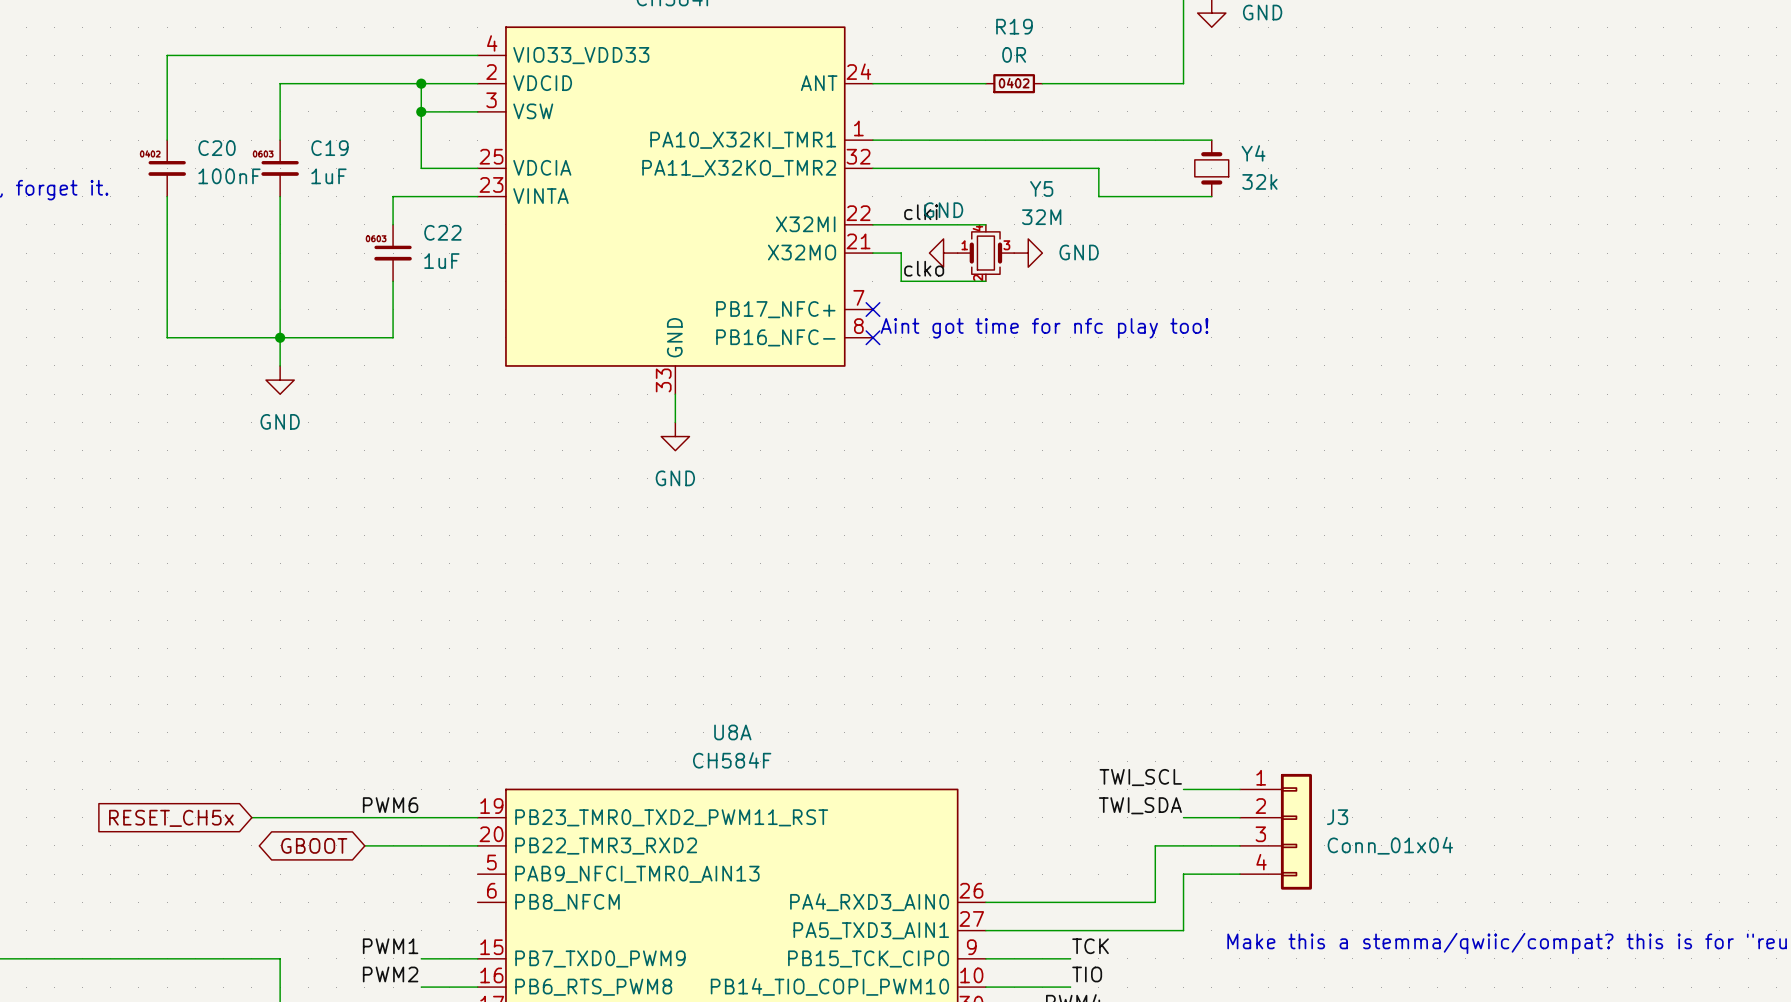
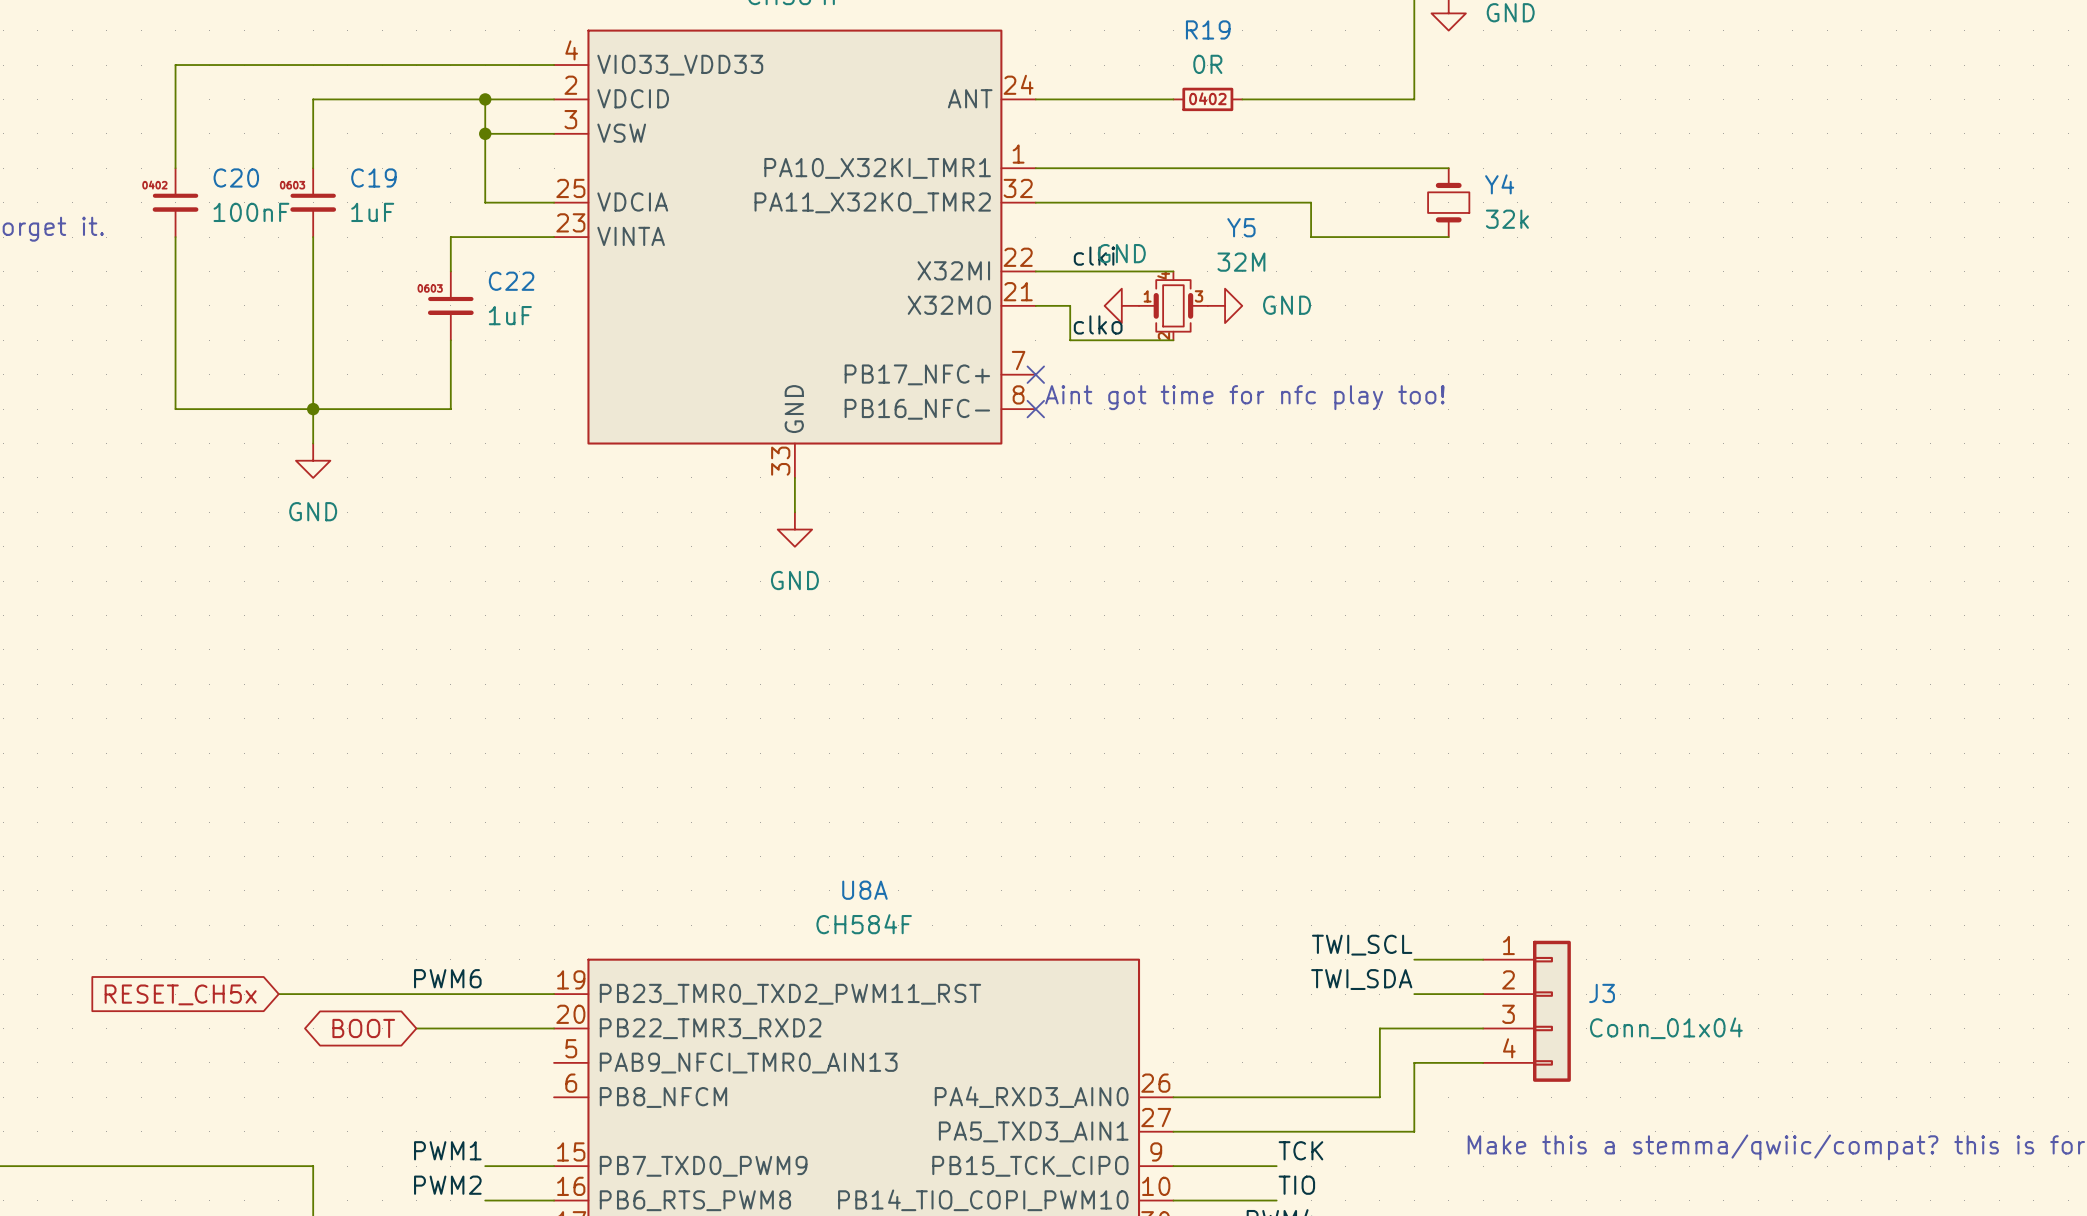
global label: GBOOT (314, 845) -> BOOT (363, 1028)

